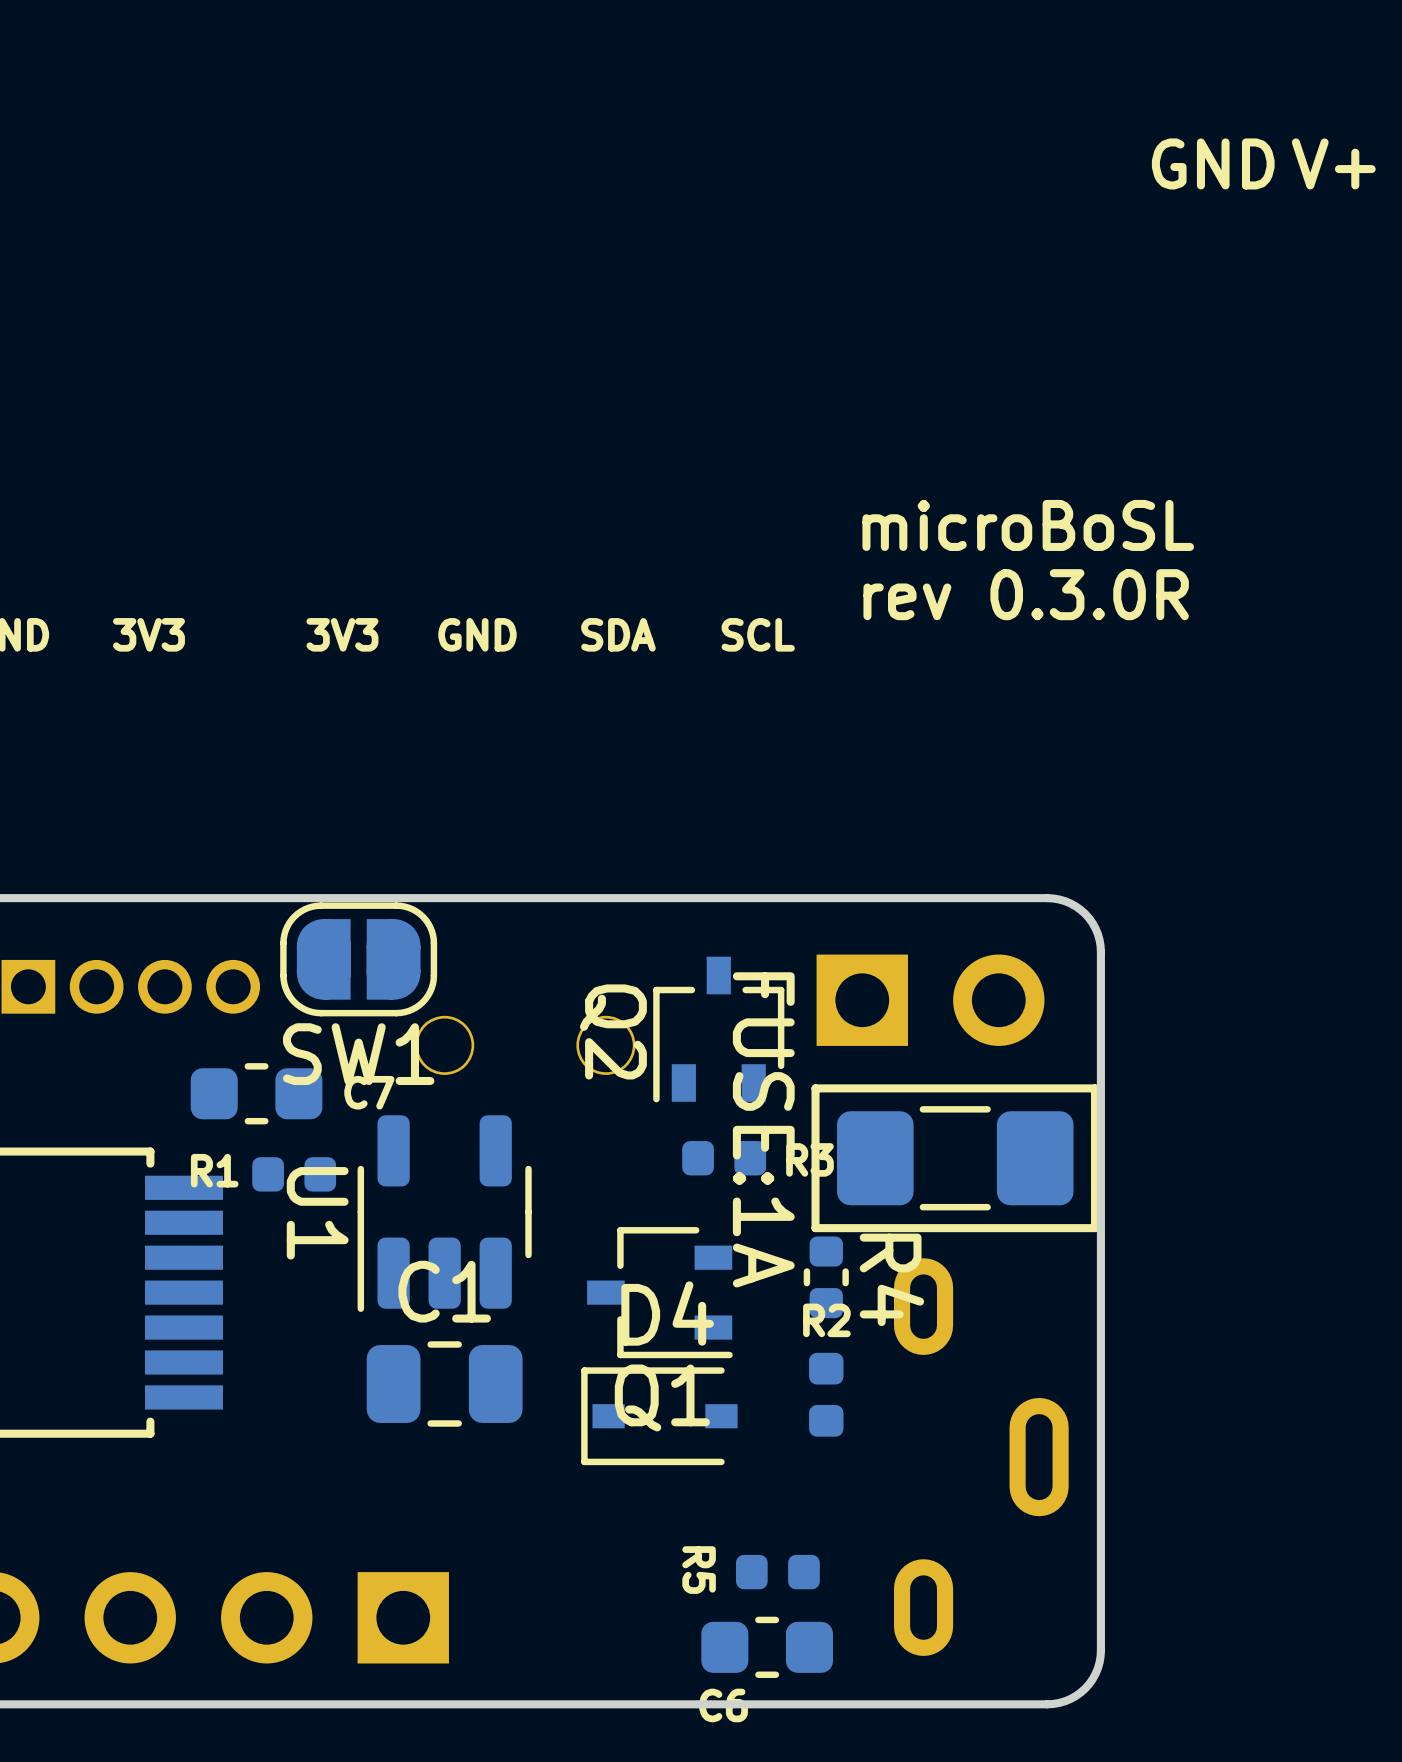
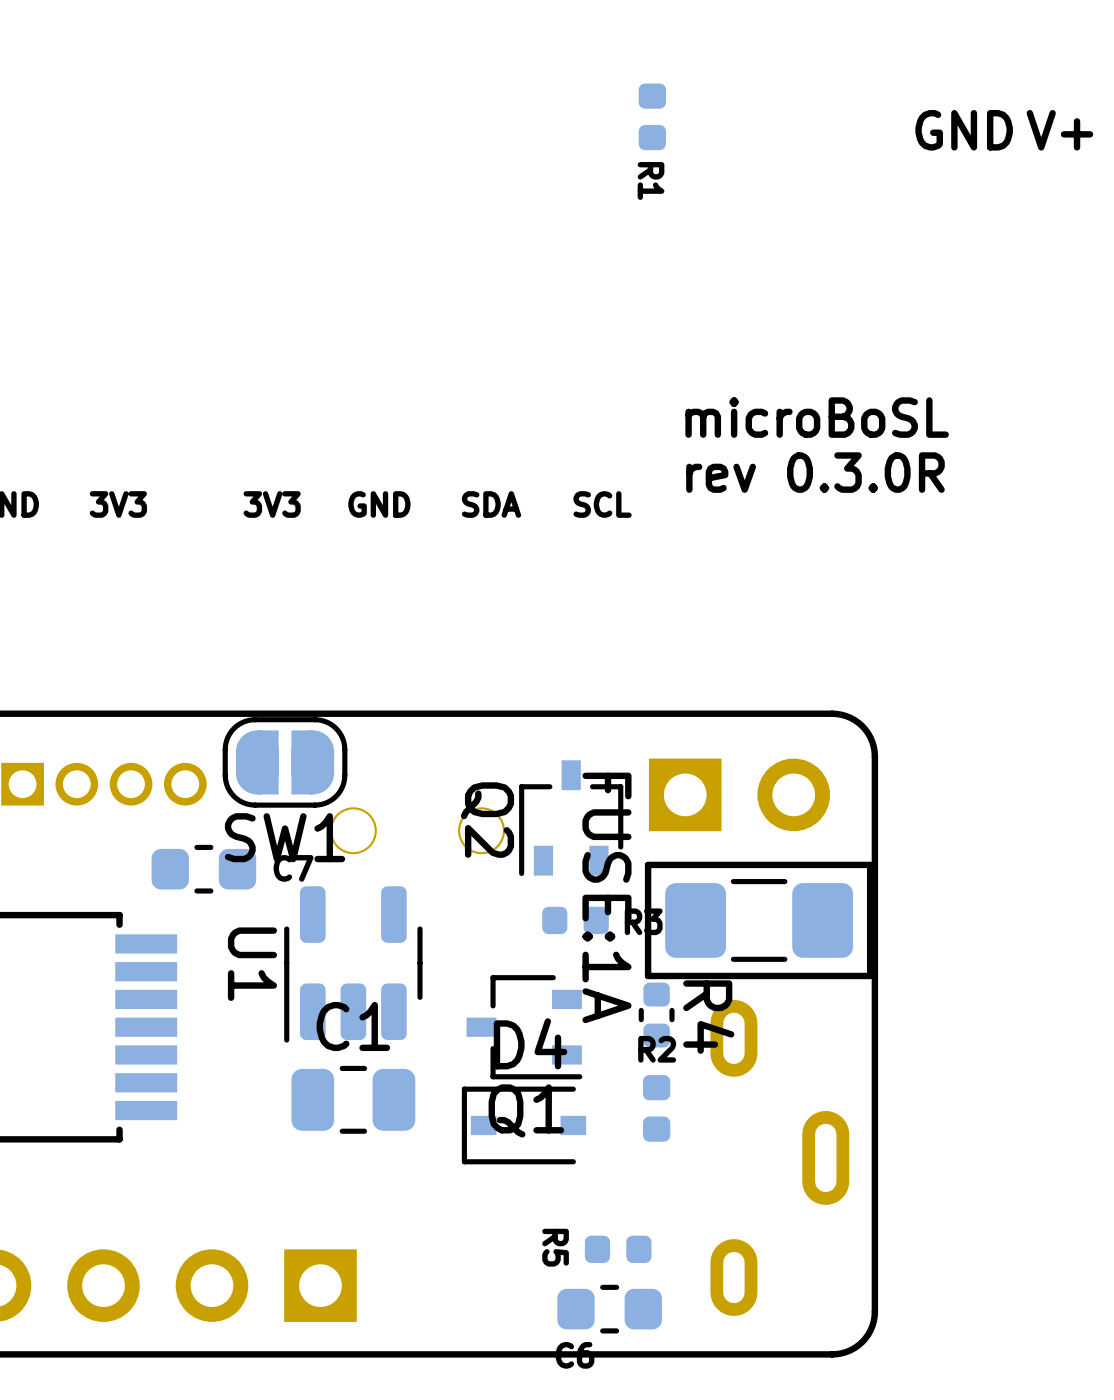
R1 name position: R1 (214, 1170) -> R1 (651, 180)
R1 rotation: 0° (294, 1174) -> 90° clockwise (652, 116)
R1 position: (294, 1174) -> (652, 116)

